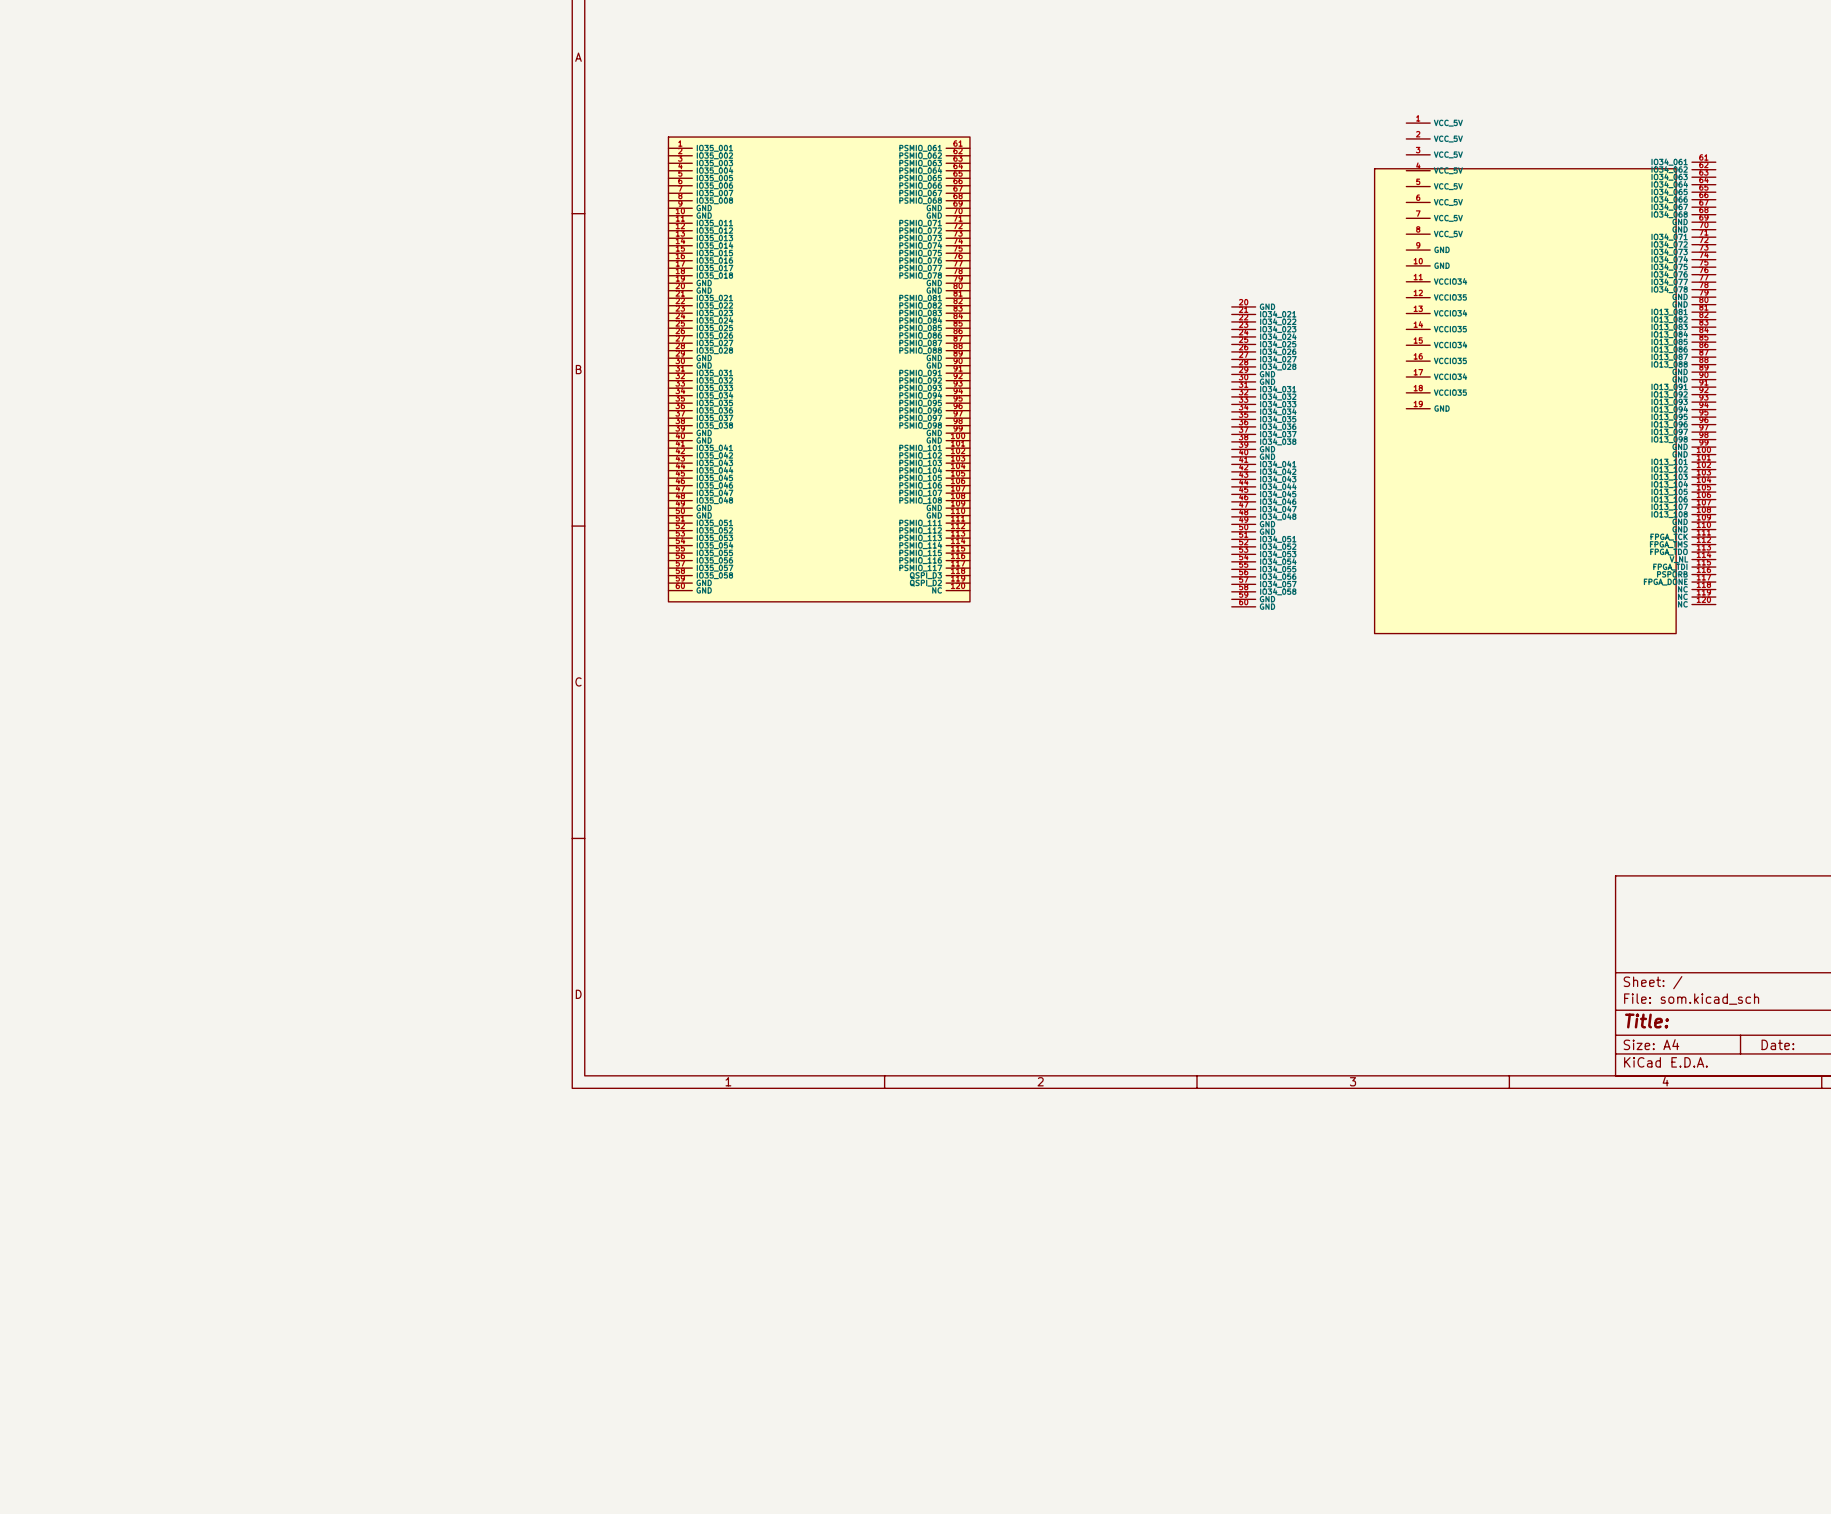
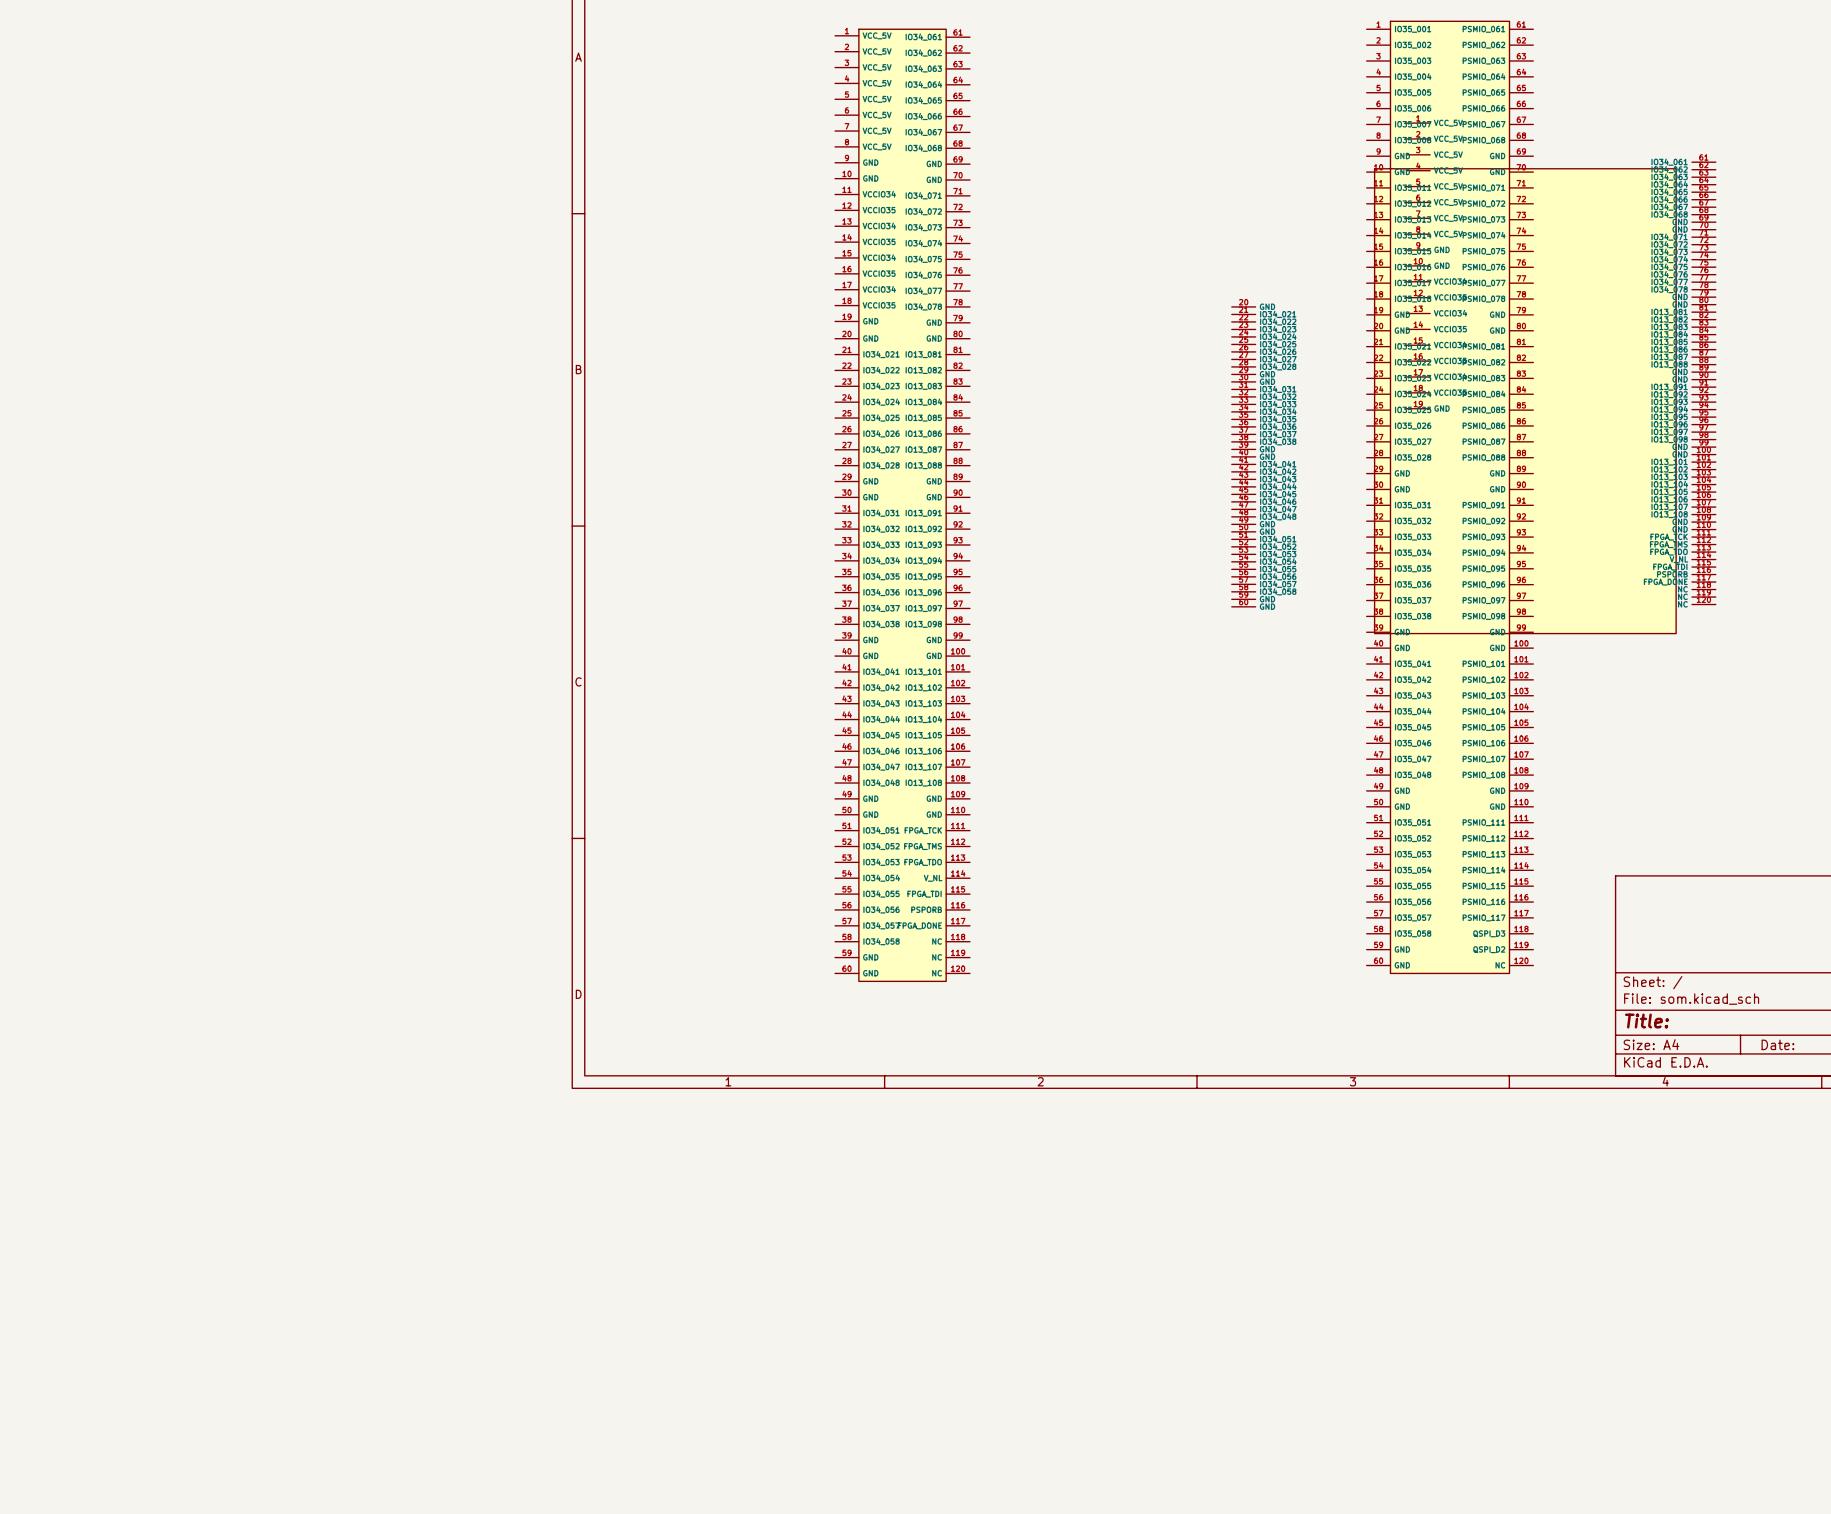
part: (819, 369) -> none
part: none -> (1449, 497)
part: none -> (902, 505)

